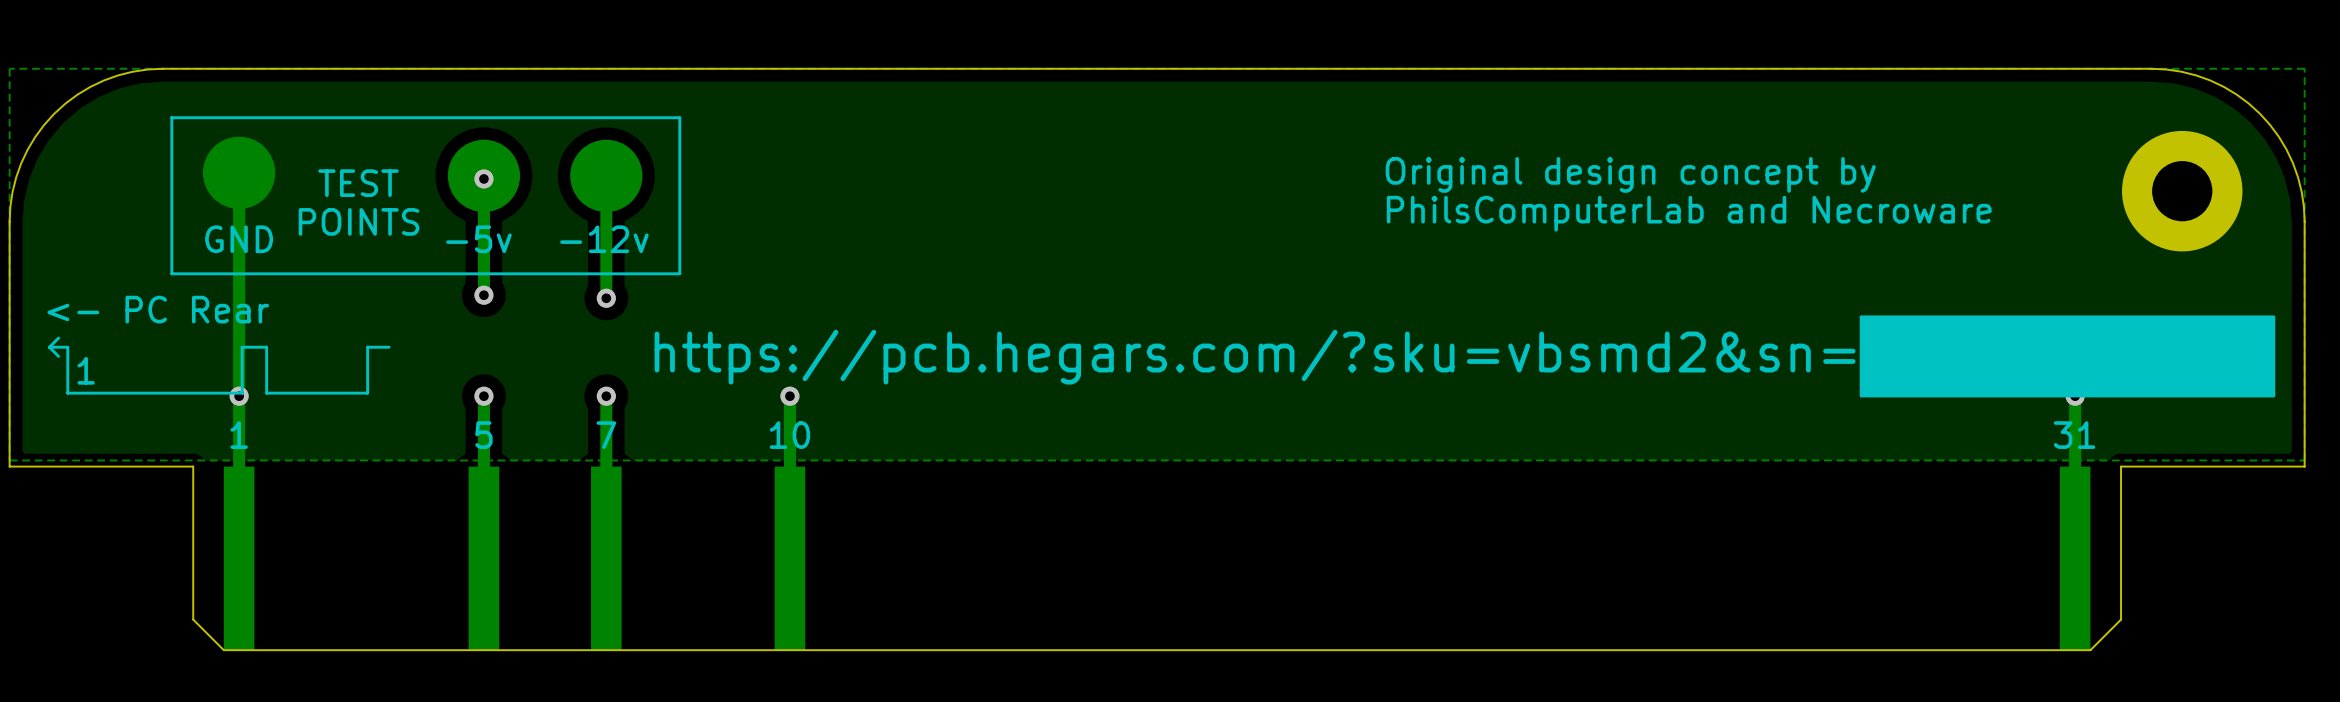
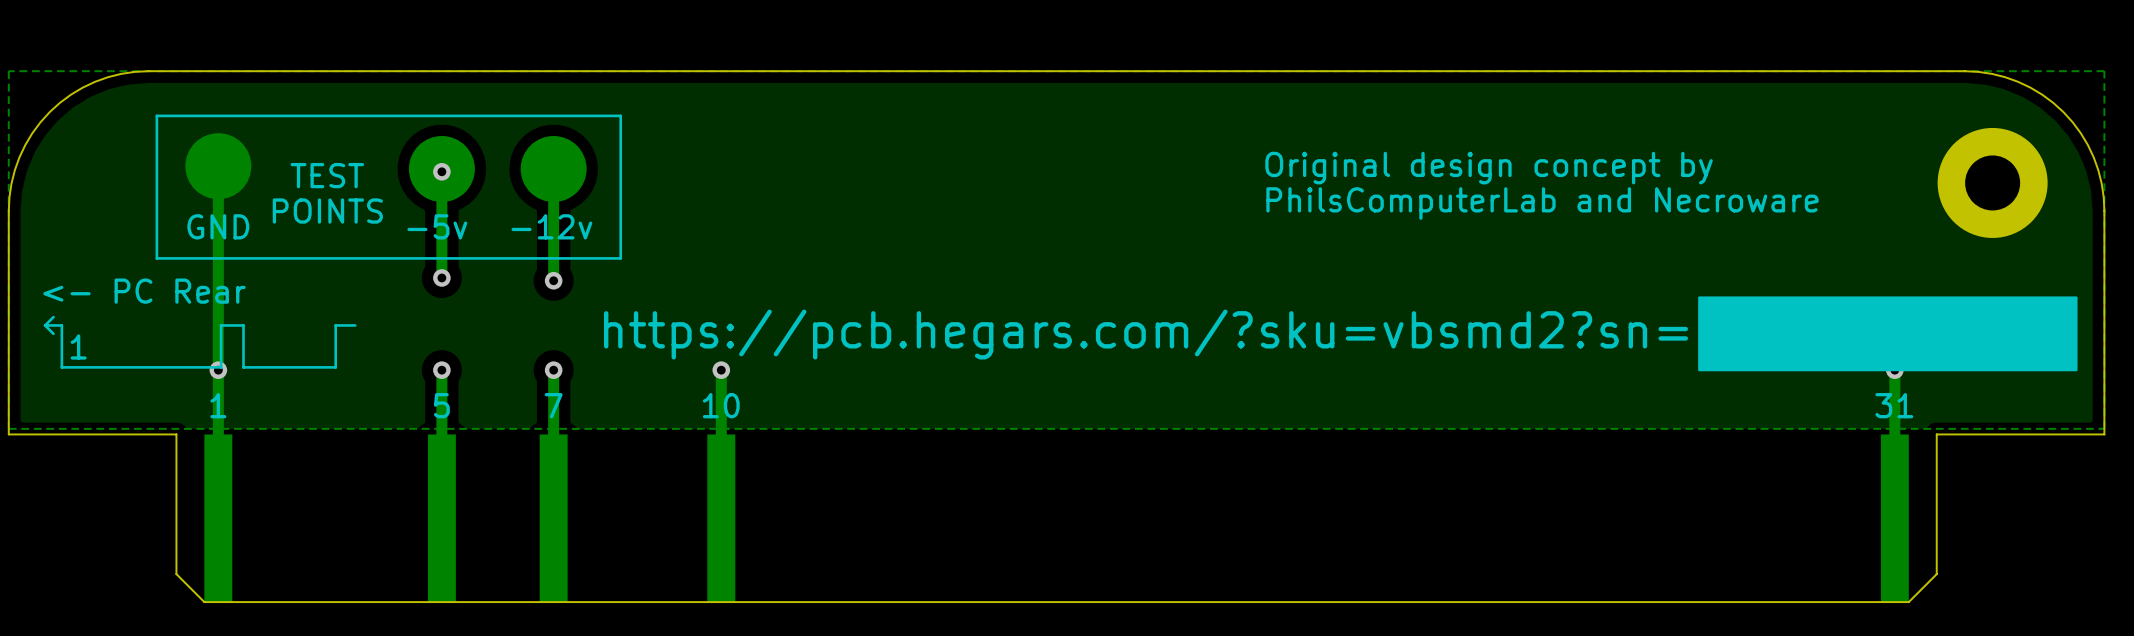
text: https://pcb.hegars.com/?sku=vbsmd2&sn= (1255, 357) -> https://pcb.hegars.com/?sku=vbsmd2?sn= (1146, 334)

